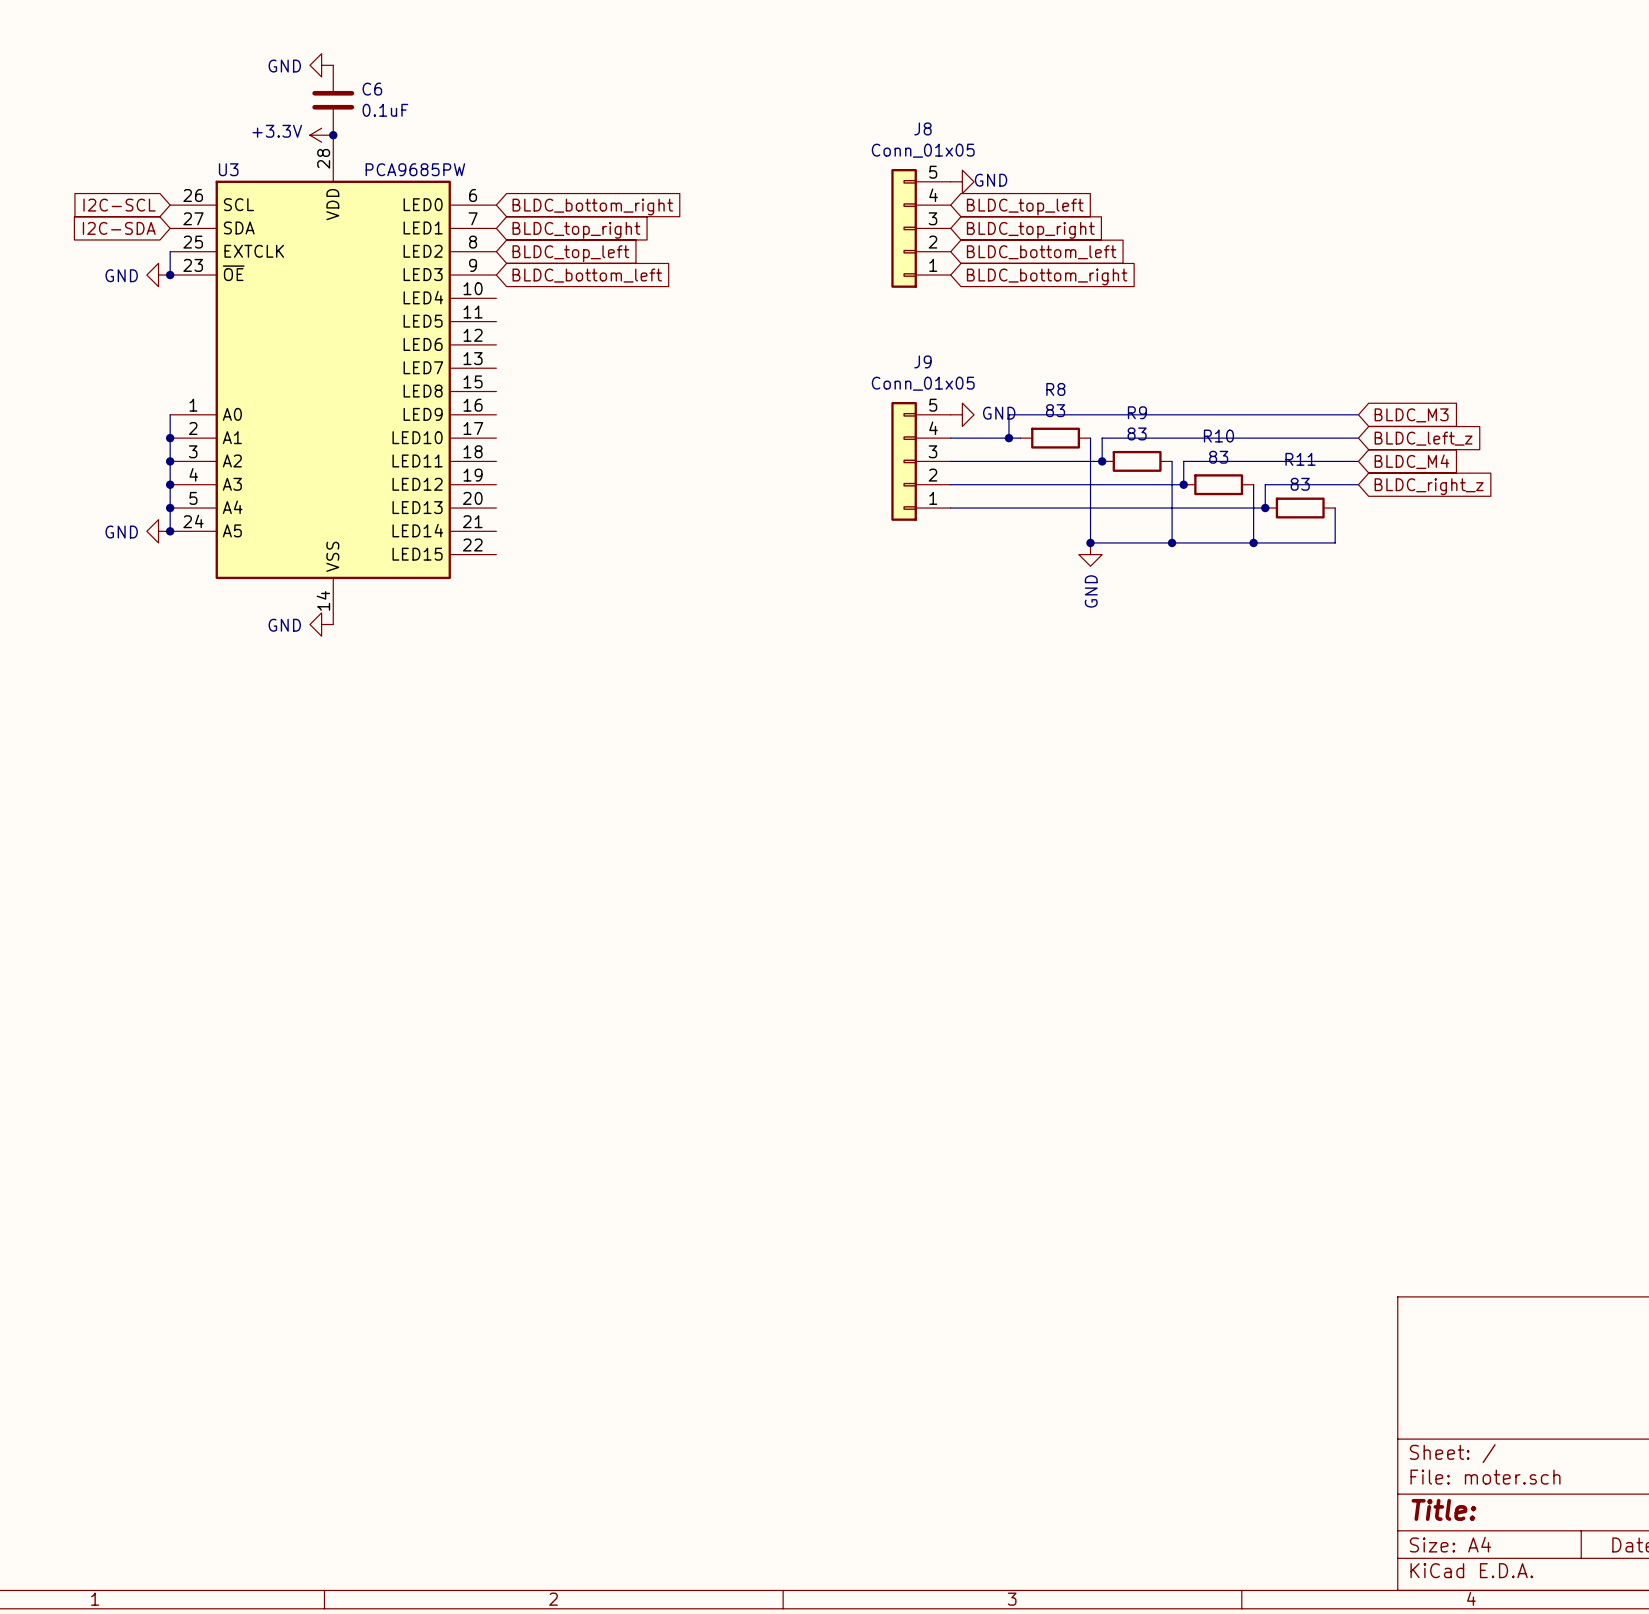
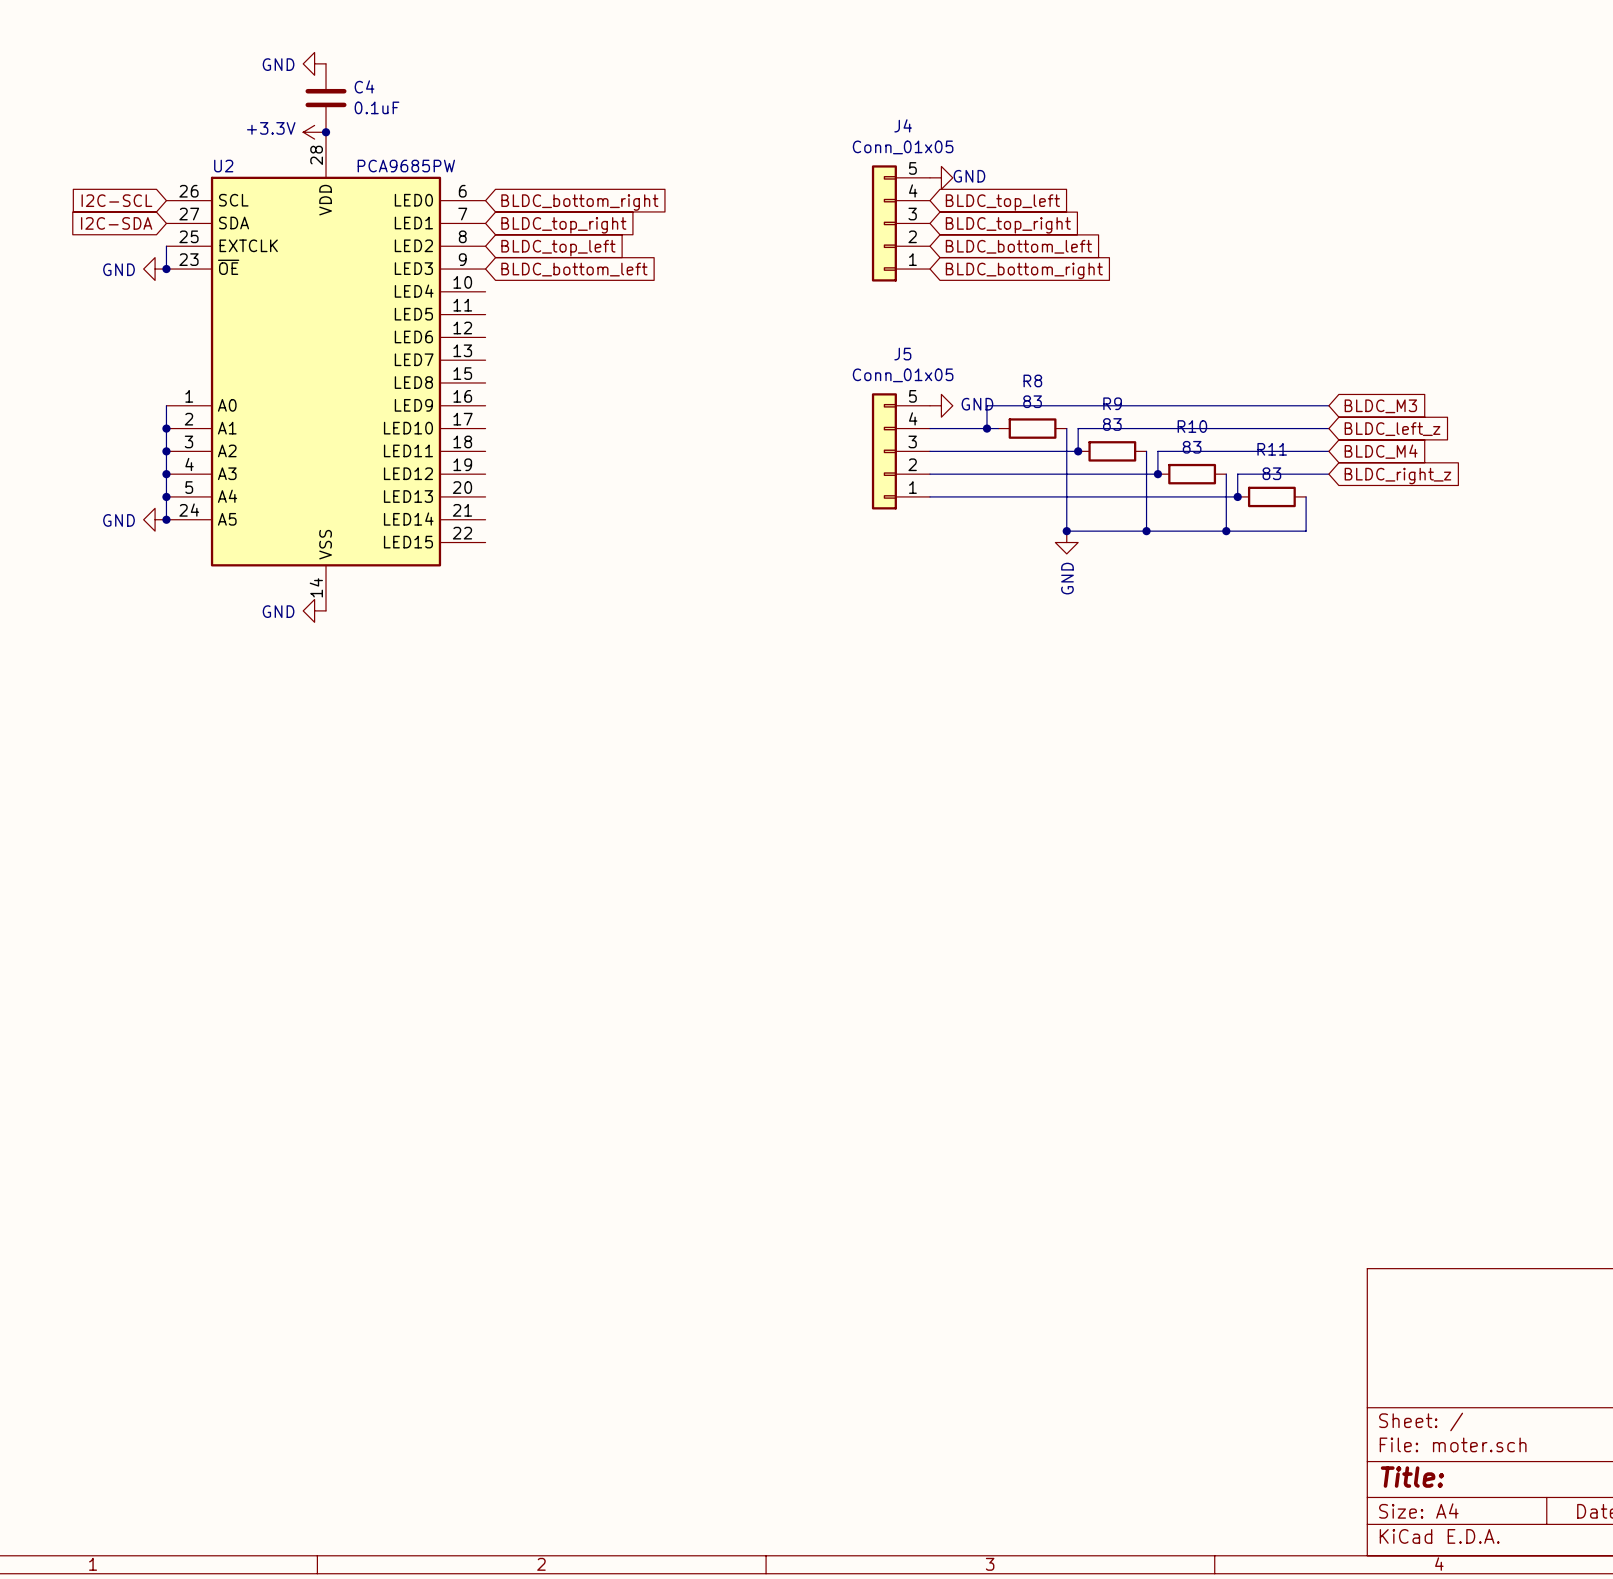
C6 name: C6 (372, 89) -> C4 (364, 86)
J8 name: J8 (922, 128) -> J4 (903, 125)
U3 name: U3 (228, 169) -> U2 (223, 166)
J9 name: J9 (922, 361) -> J5 (902, 354)

